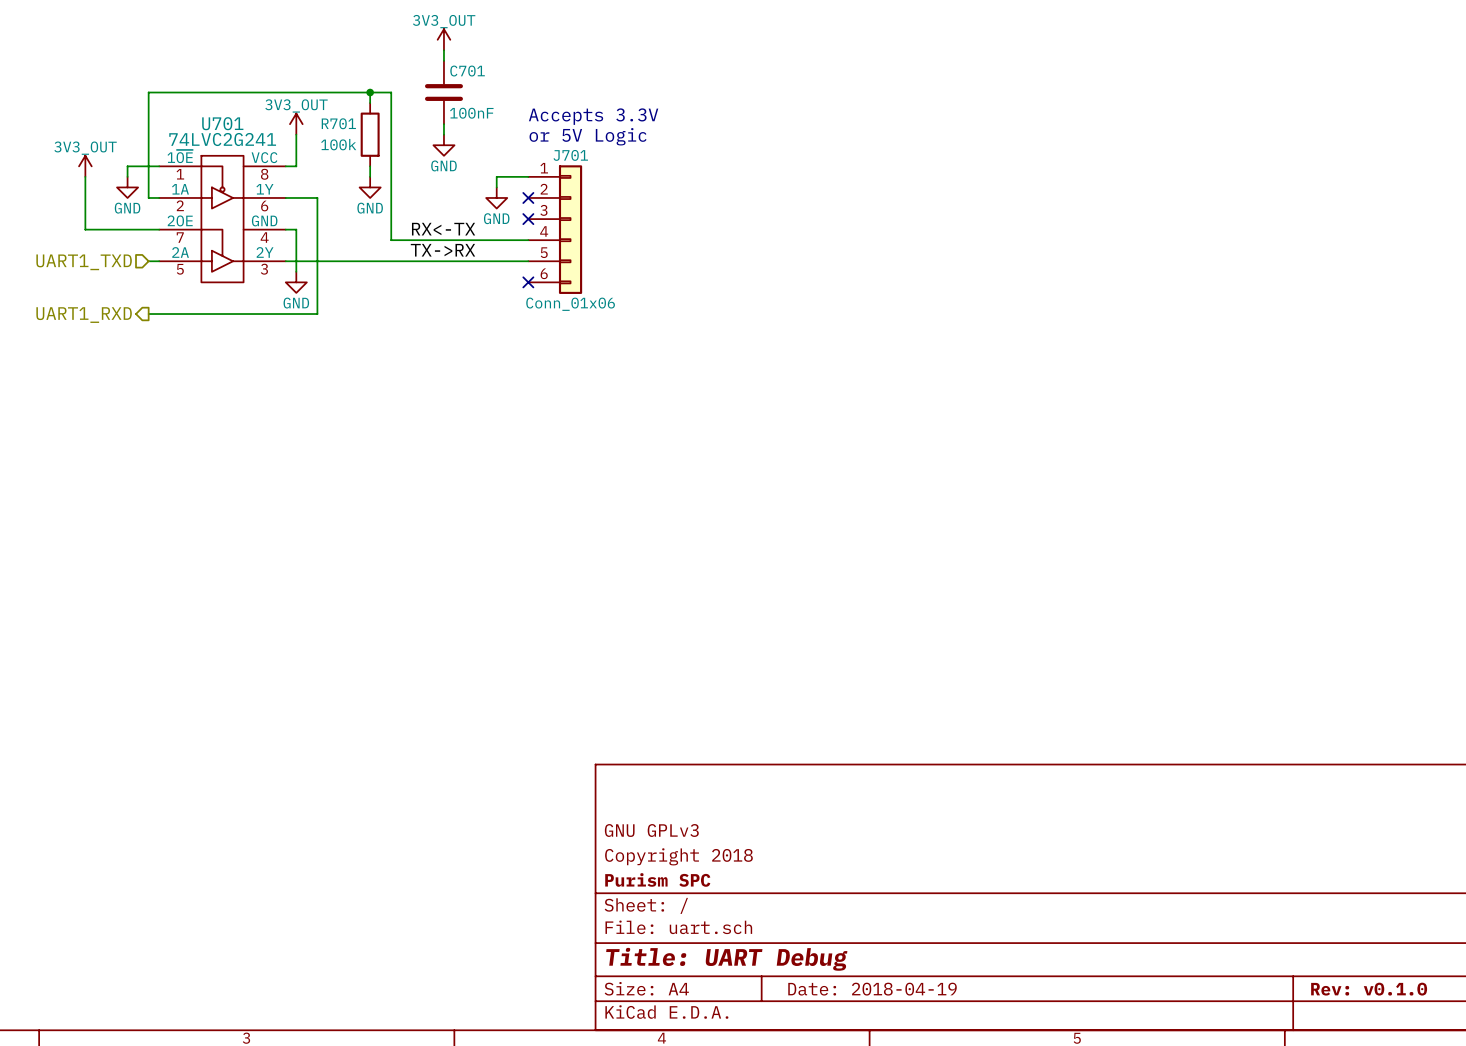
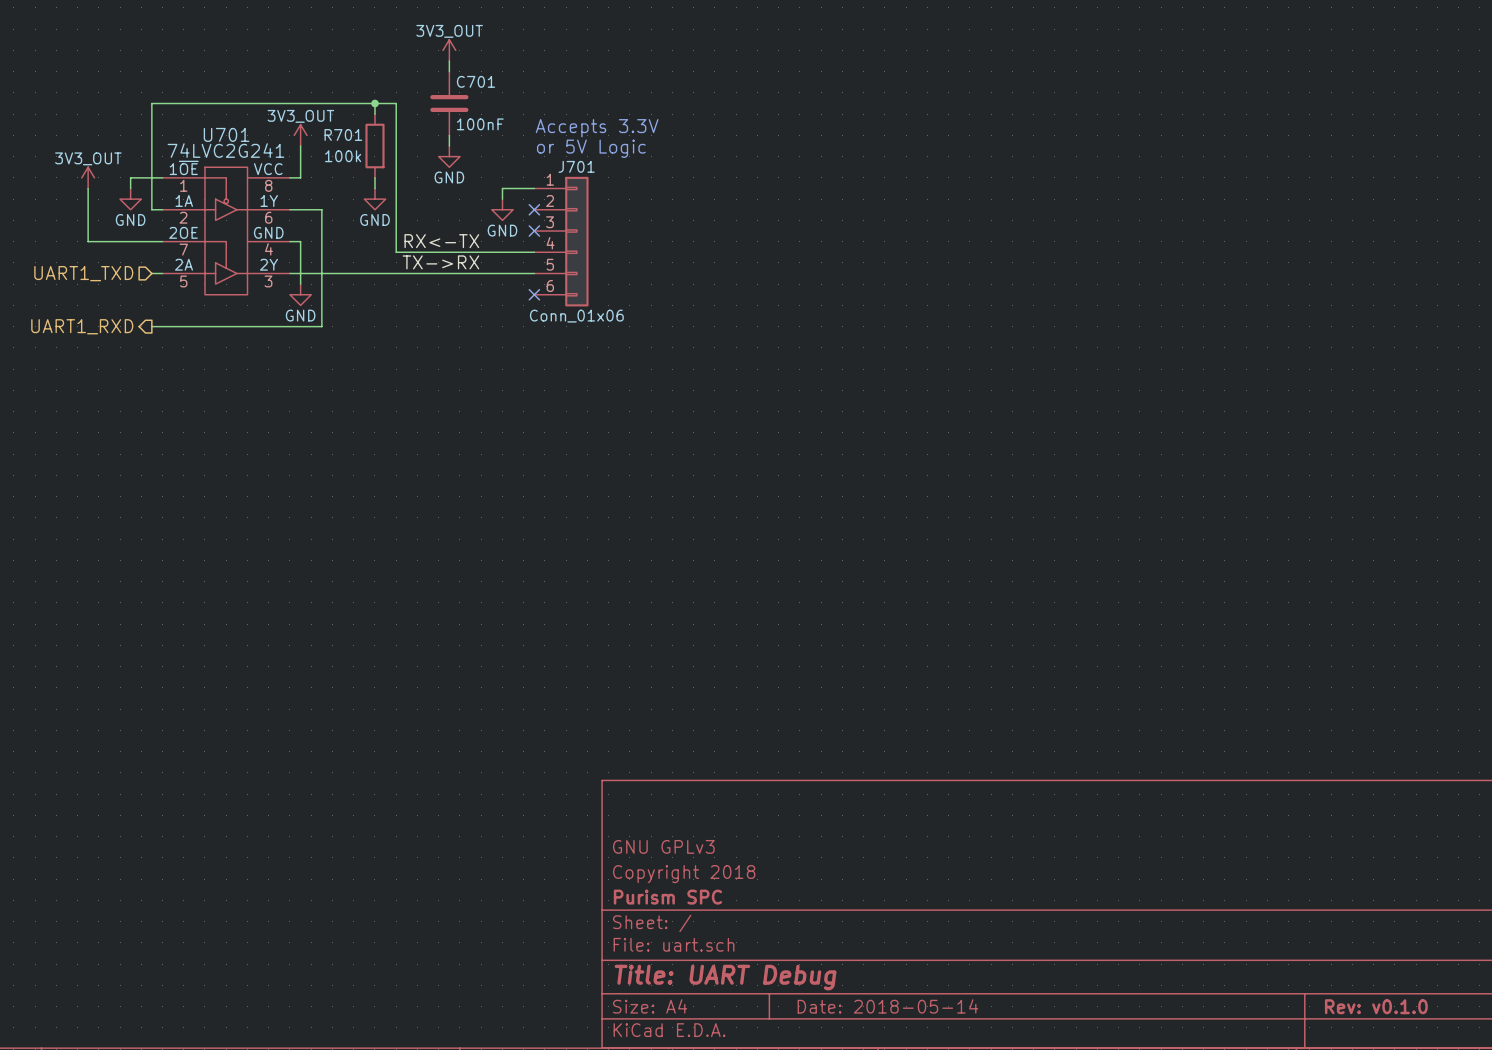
title block: Date: 2018-04-19 (872, 989) -> Date: 2018-05-14 (887, 1006)

